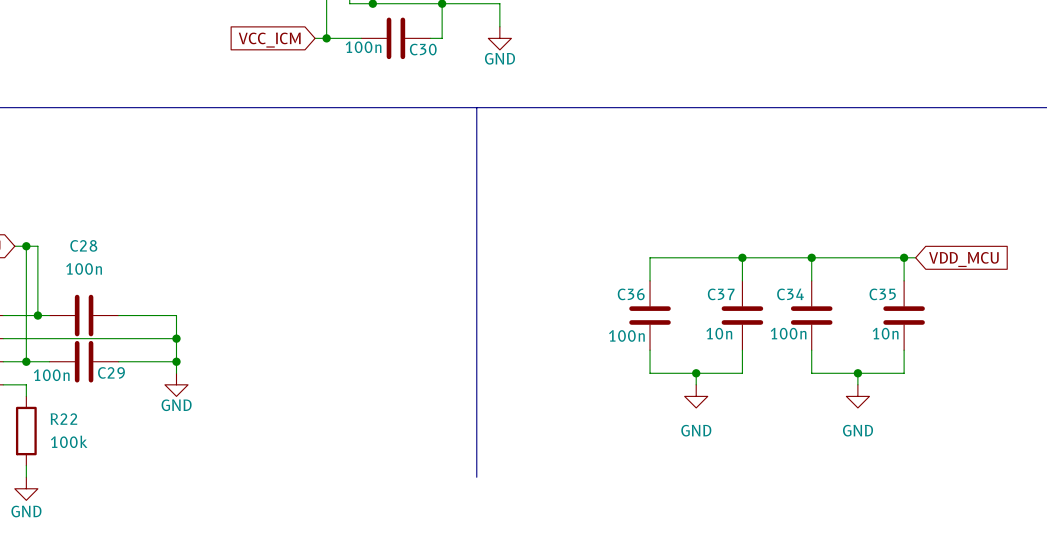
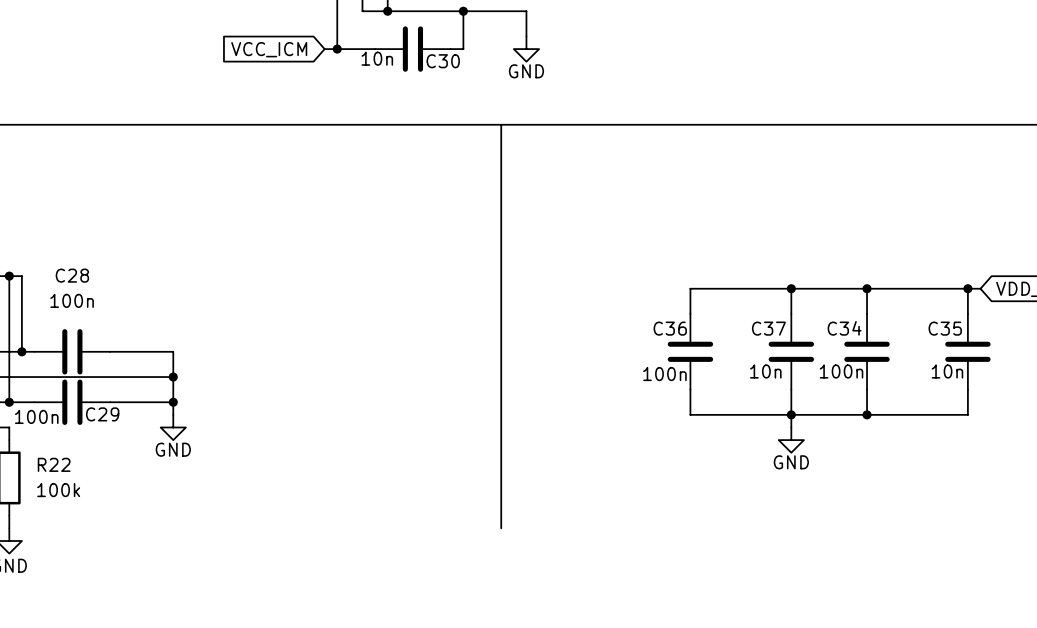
C30 value: 100n (363, 47) -> 10n (377, 58)
wire: (696, 373) (696, 384) -> none
junction position: (696, 373) -> (791, 414)
wire: none -> (867, 414) (791, 414) (791, 427)
wire: (857, 373) (857, 384) -> none
junction position: (857, 373) -> (867, 414)
power symbol position: GND (696, 396) -> GND (791, 440)
power symbol: GND (857, 396) -> none
power symbol text position: GND (696, 430) -> GND (791, 462)

